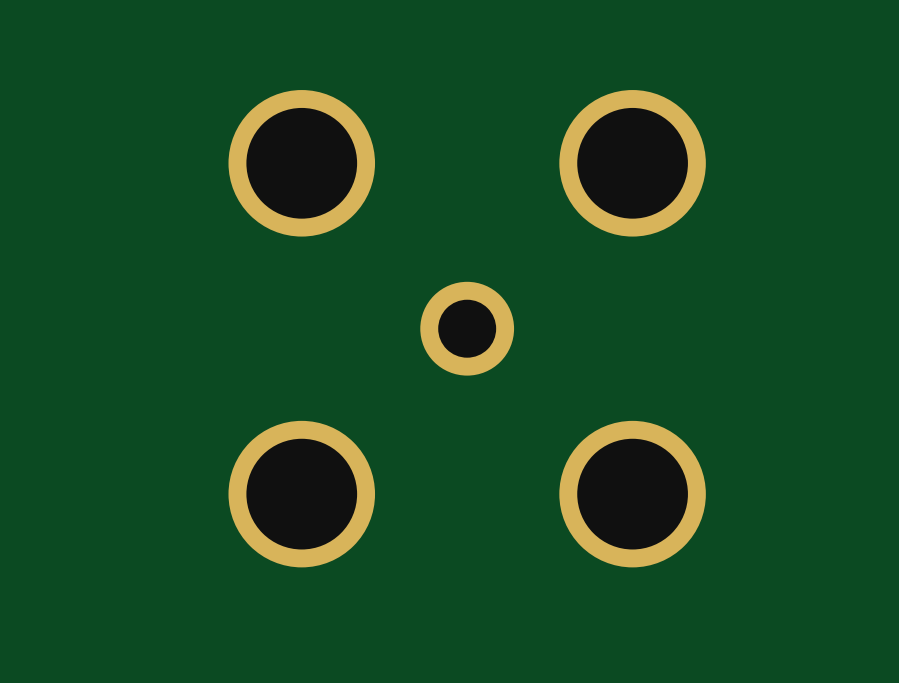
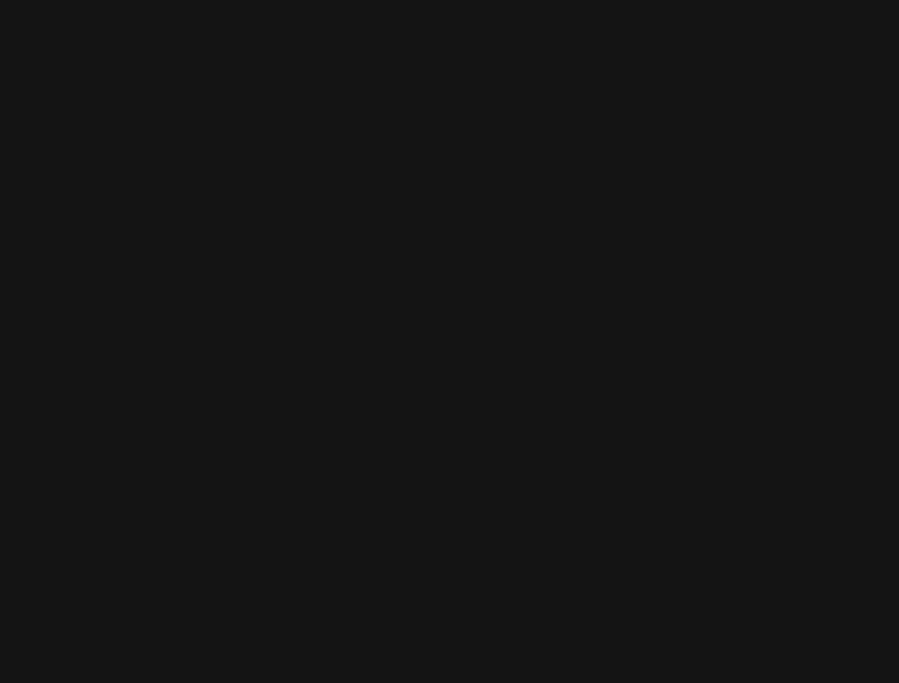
part: (467, 328) -> none

